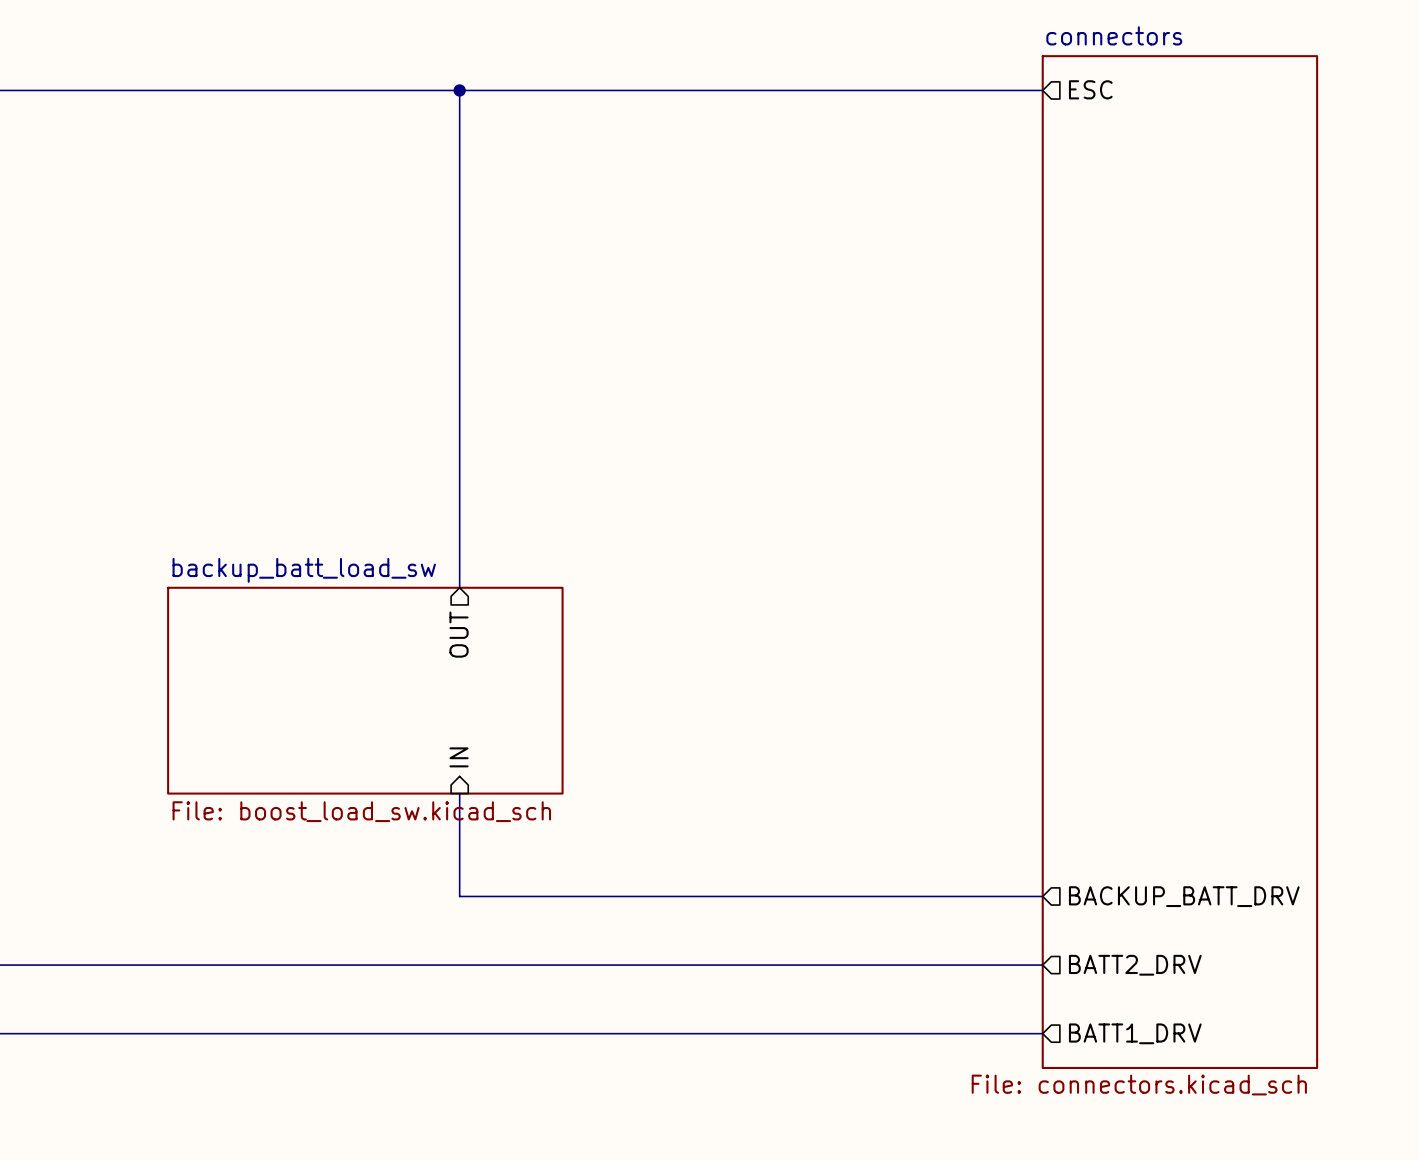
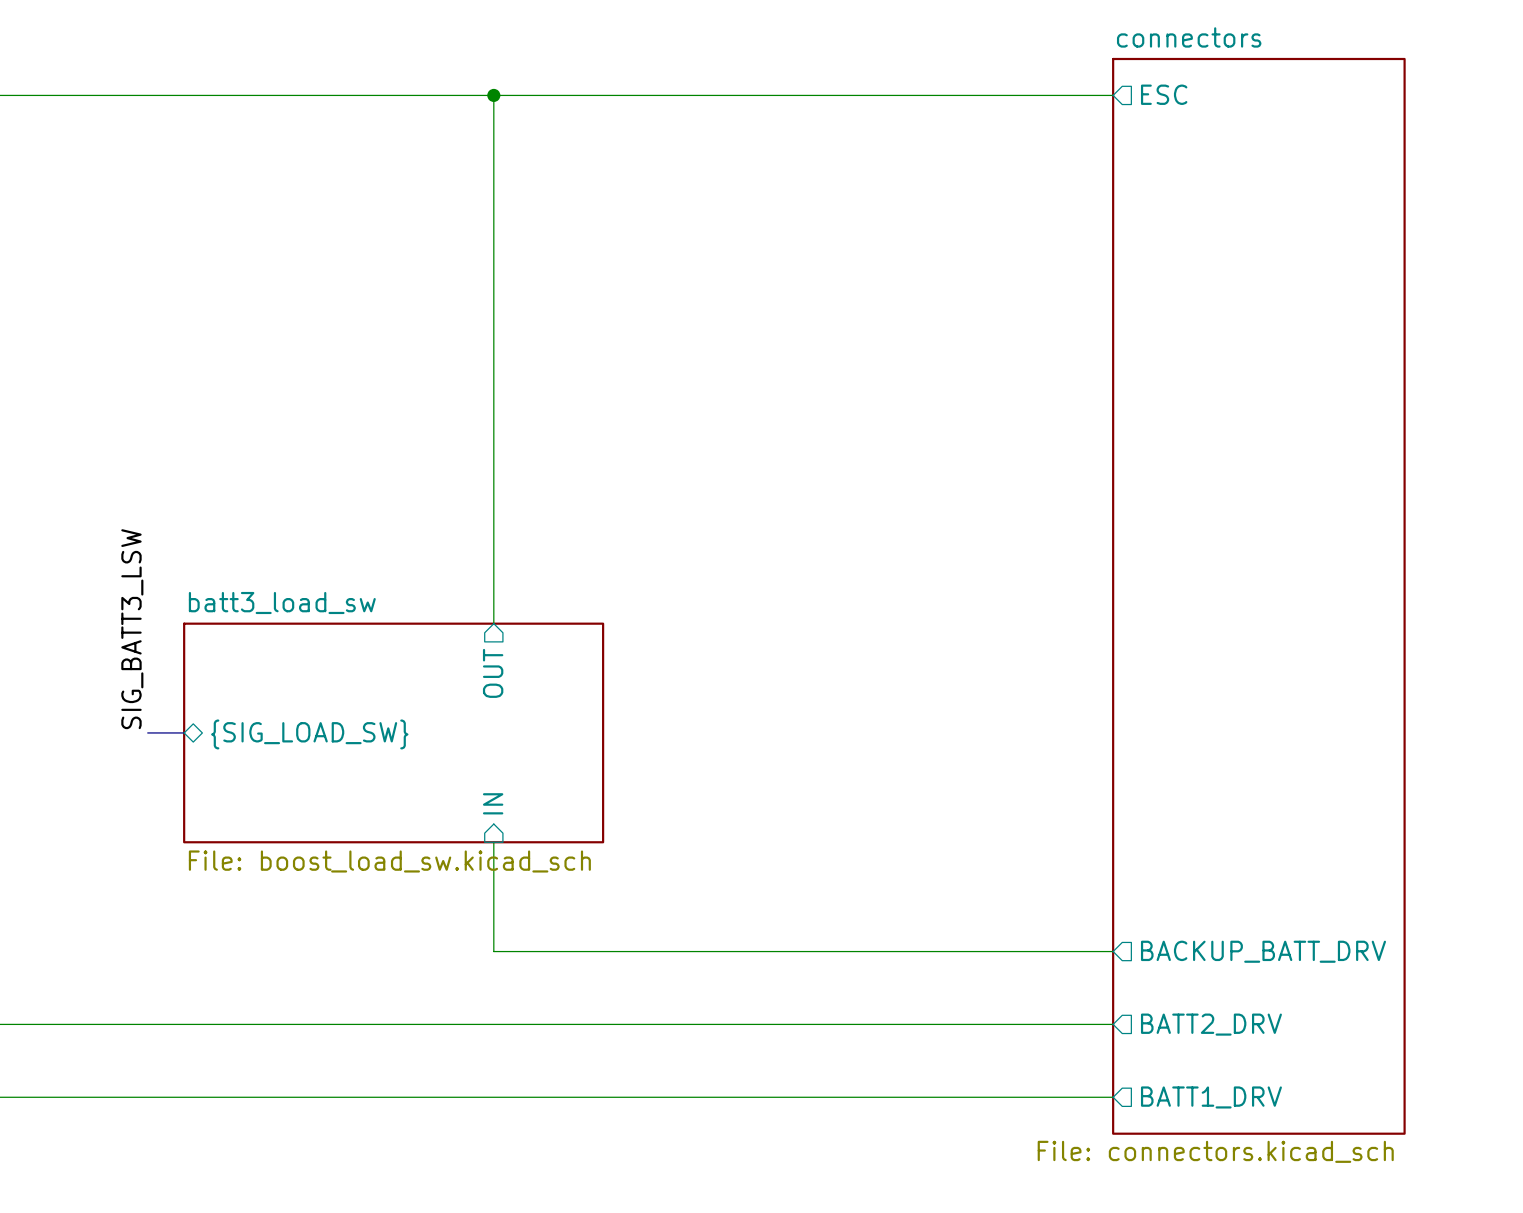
sheet backup_batt_load_sw name: backup_batt_load_sw (304, 570) -> batt3_load_sw (282, 602)
label: none -> SIG_BATT3_LSW (132, 629)
bus: none -> (147, 732) (184, 732)
sheet pin: none -> {SIG_LOAD_SW} (309, 734)

